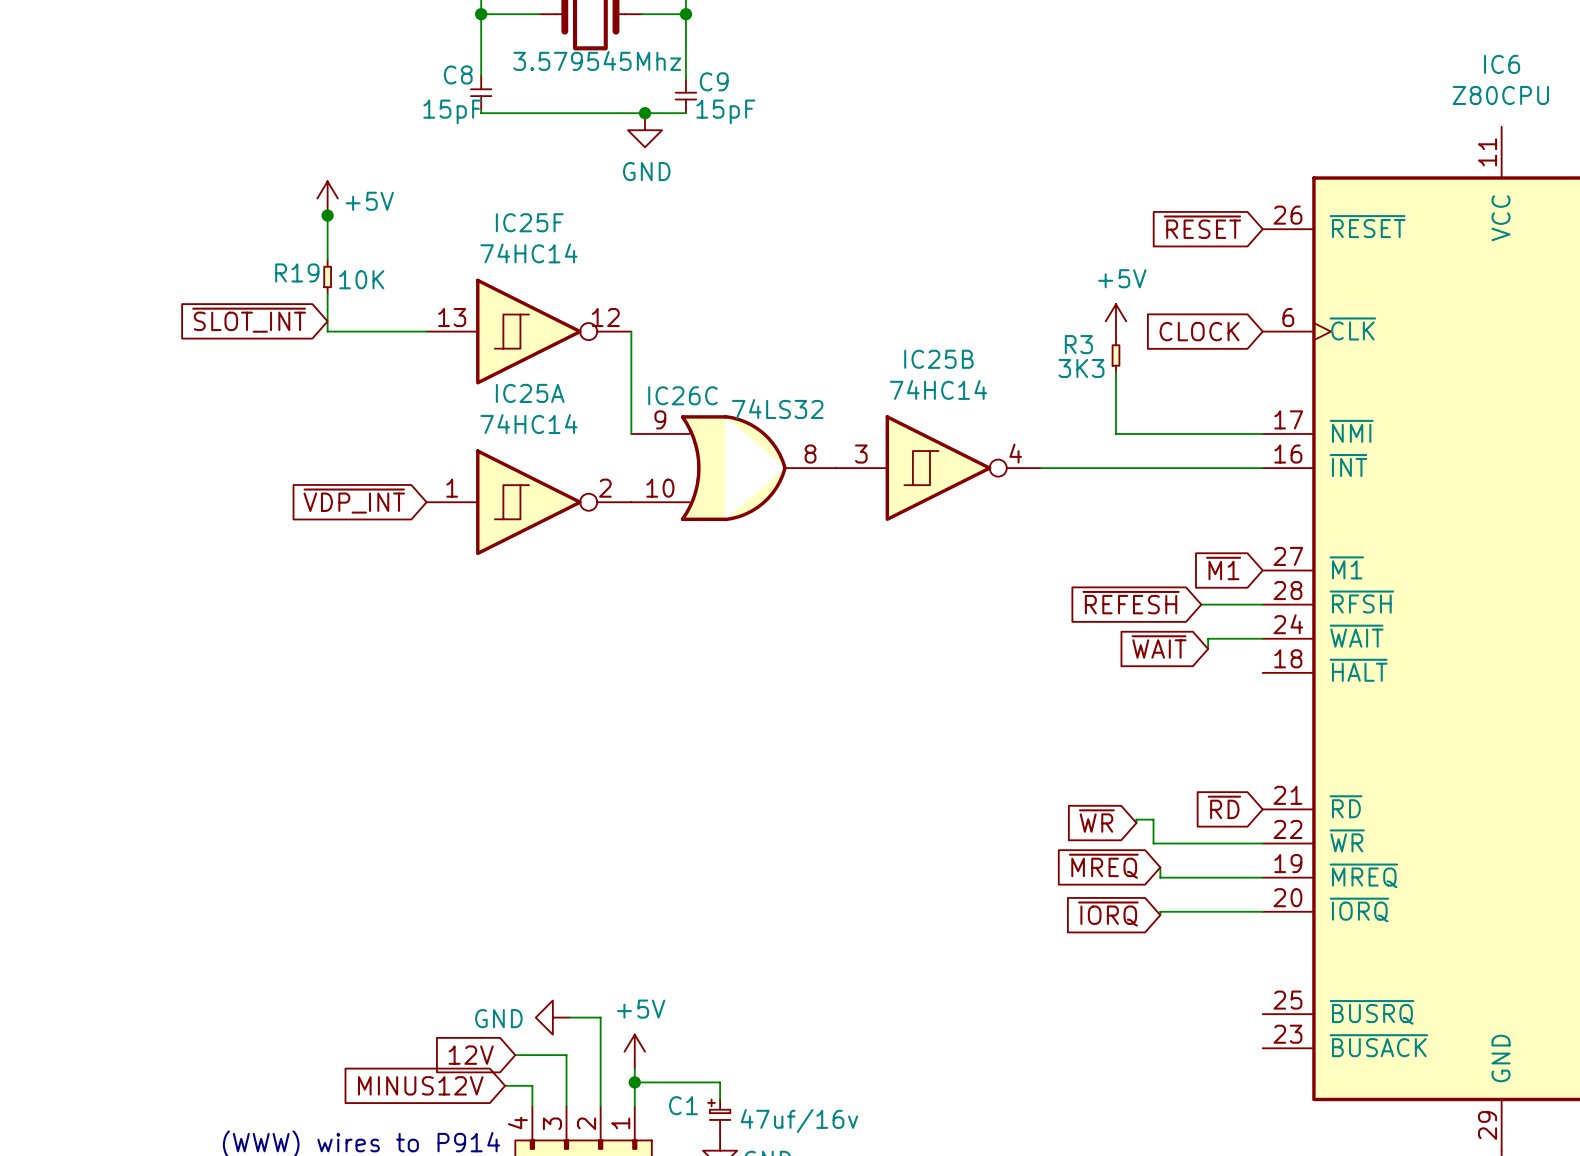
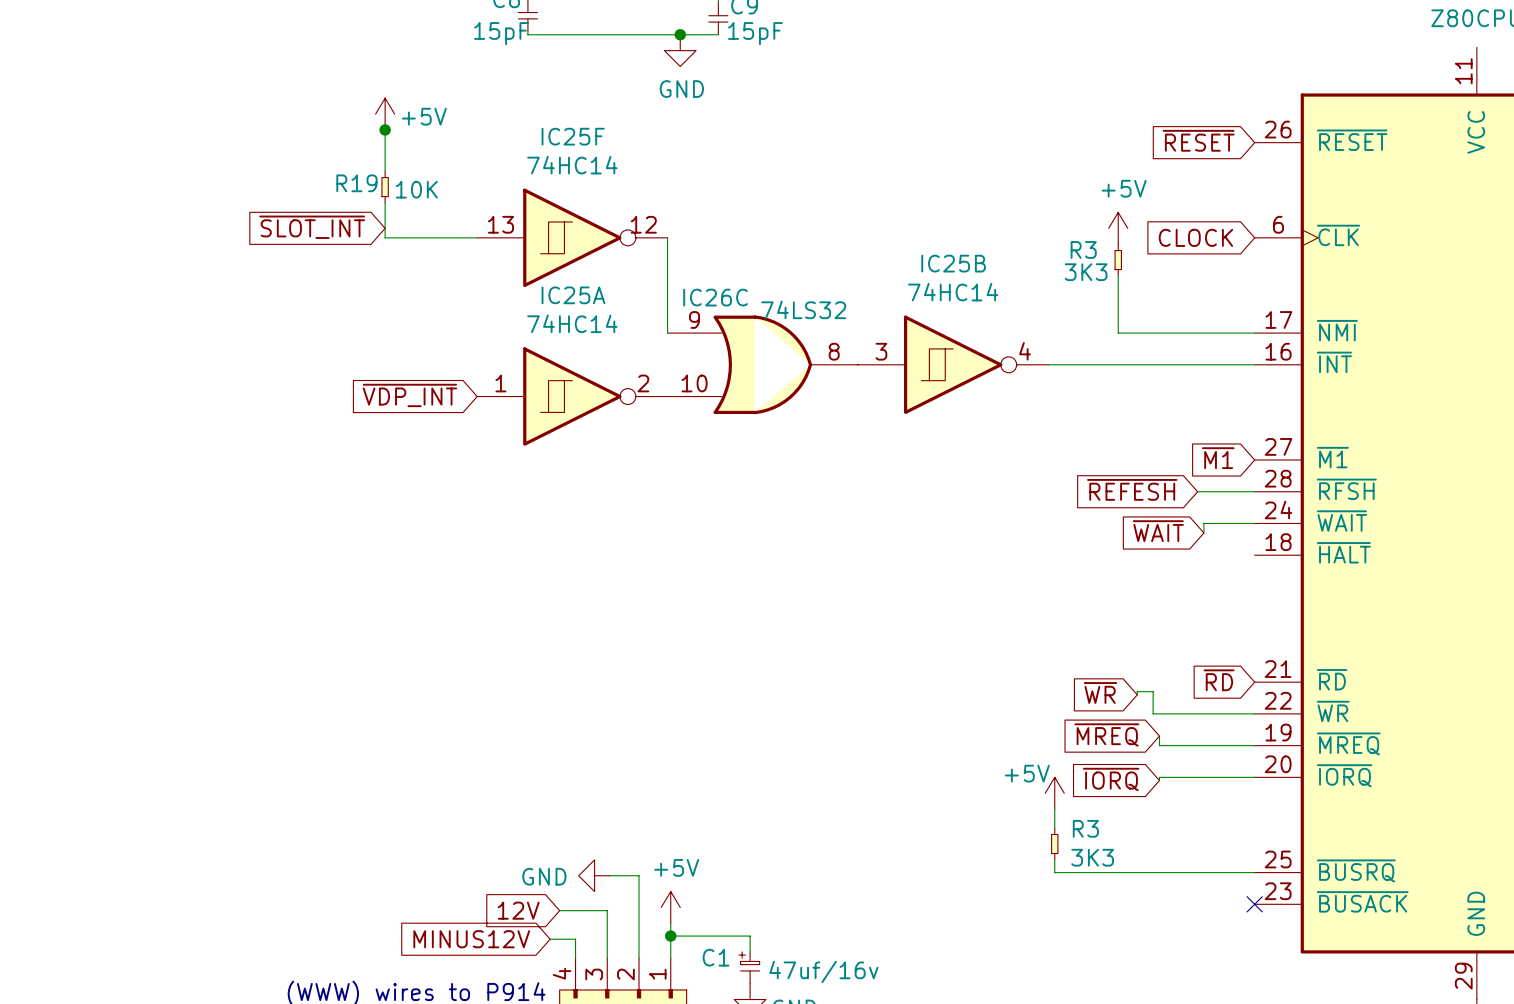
power symbol: none -> +5V (1054, 793)
wire: none -> (1054, 809) (1054, 828)
R3: none -> 3K3 (1054, 844)
wire: none -> (1054, 859) (1054, 872) (1254, 872)
no-connect mark: none -> (1254, 904)

